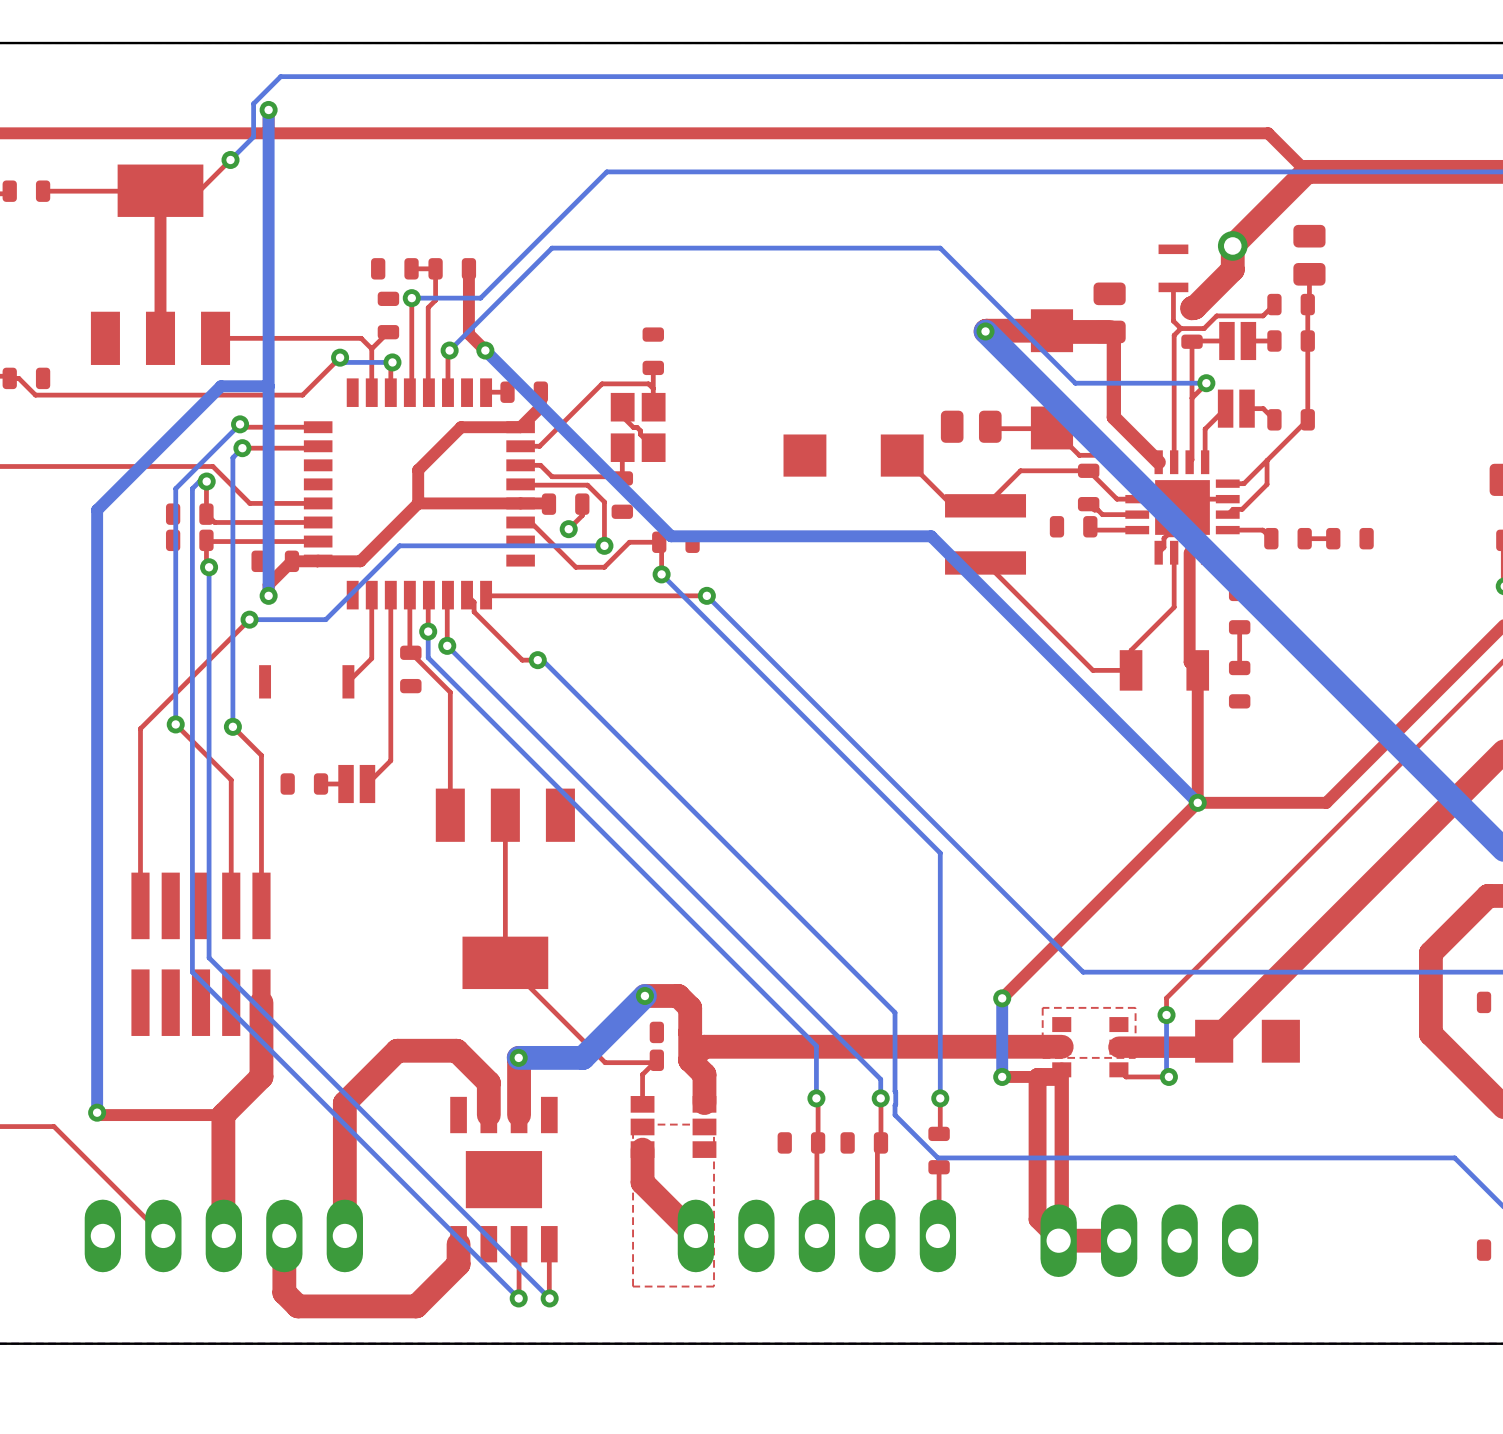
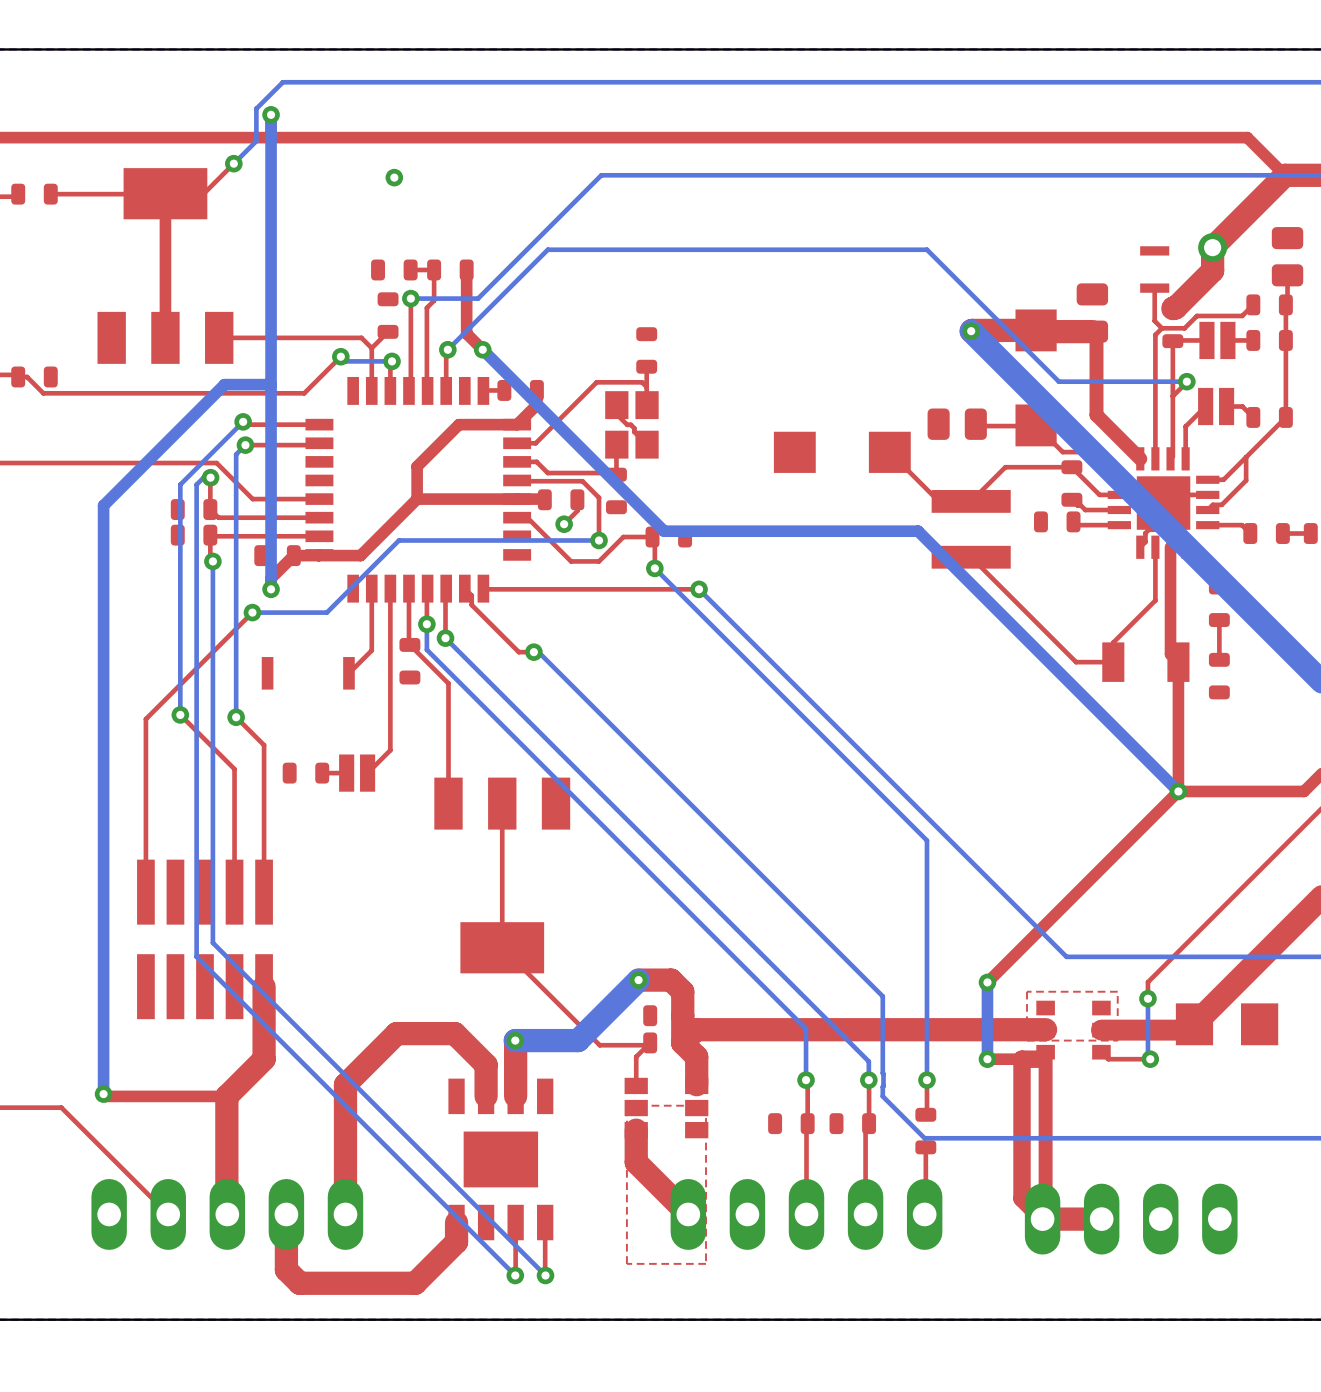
via: none -> (394, 177)

